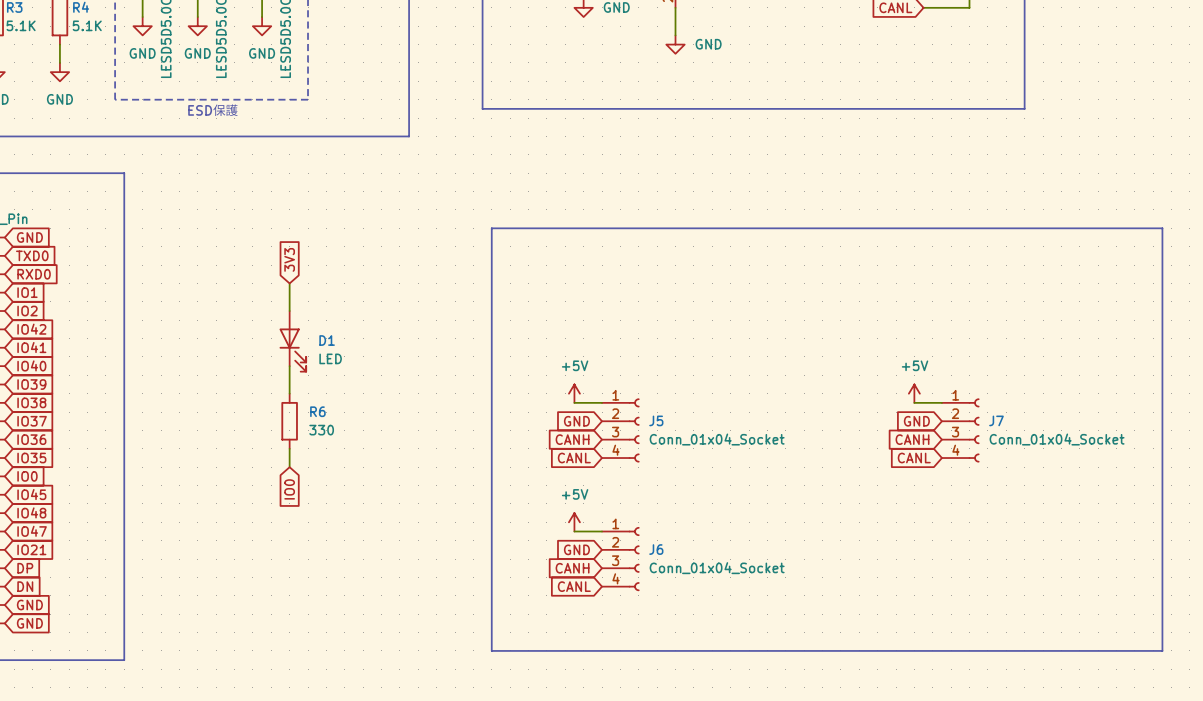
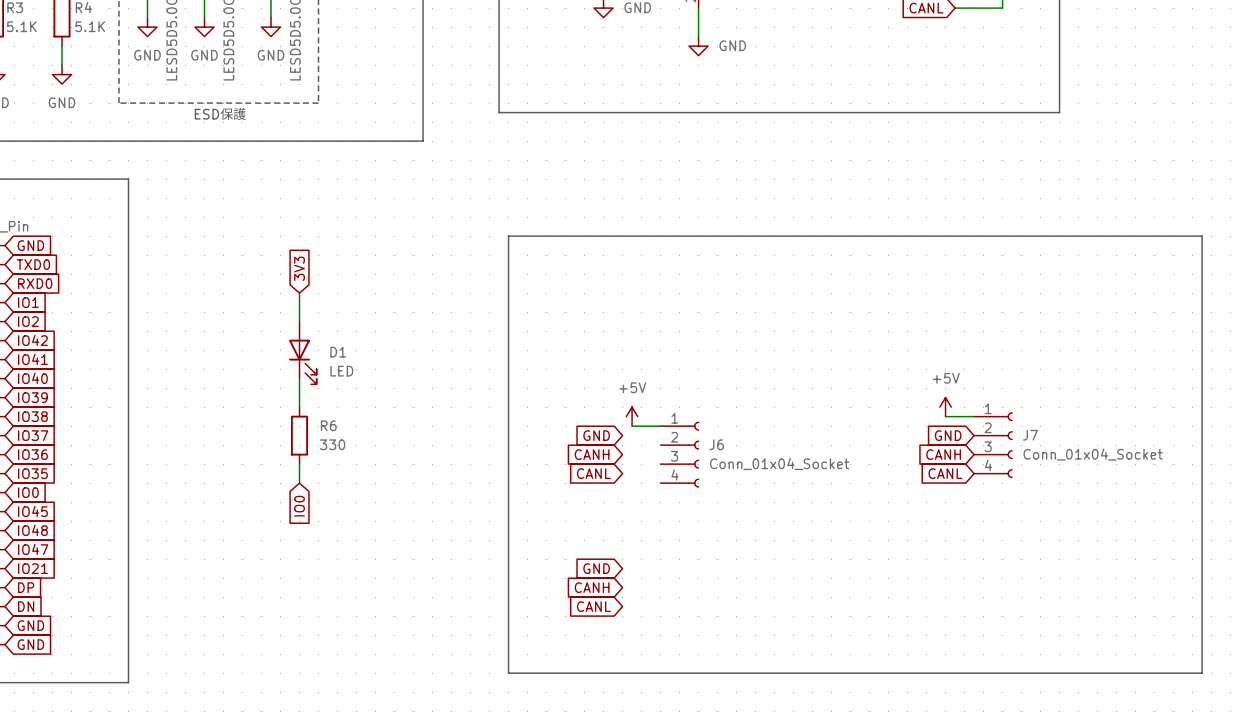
power symbol position: +5V (574, 393) -> +5V (632, 416)
wire: (574, 402) (602, 402) -> (632, 426) (660, 426)
J5: Conn_01x04_Socket (620, 430) -> none
power symbol: +5V (574, 522) -> none
wire: (574, 531) (602, 531) -> none
J6 position: (620, 559) -> (679, 454)

